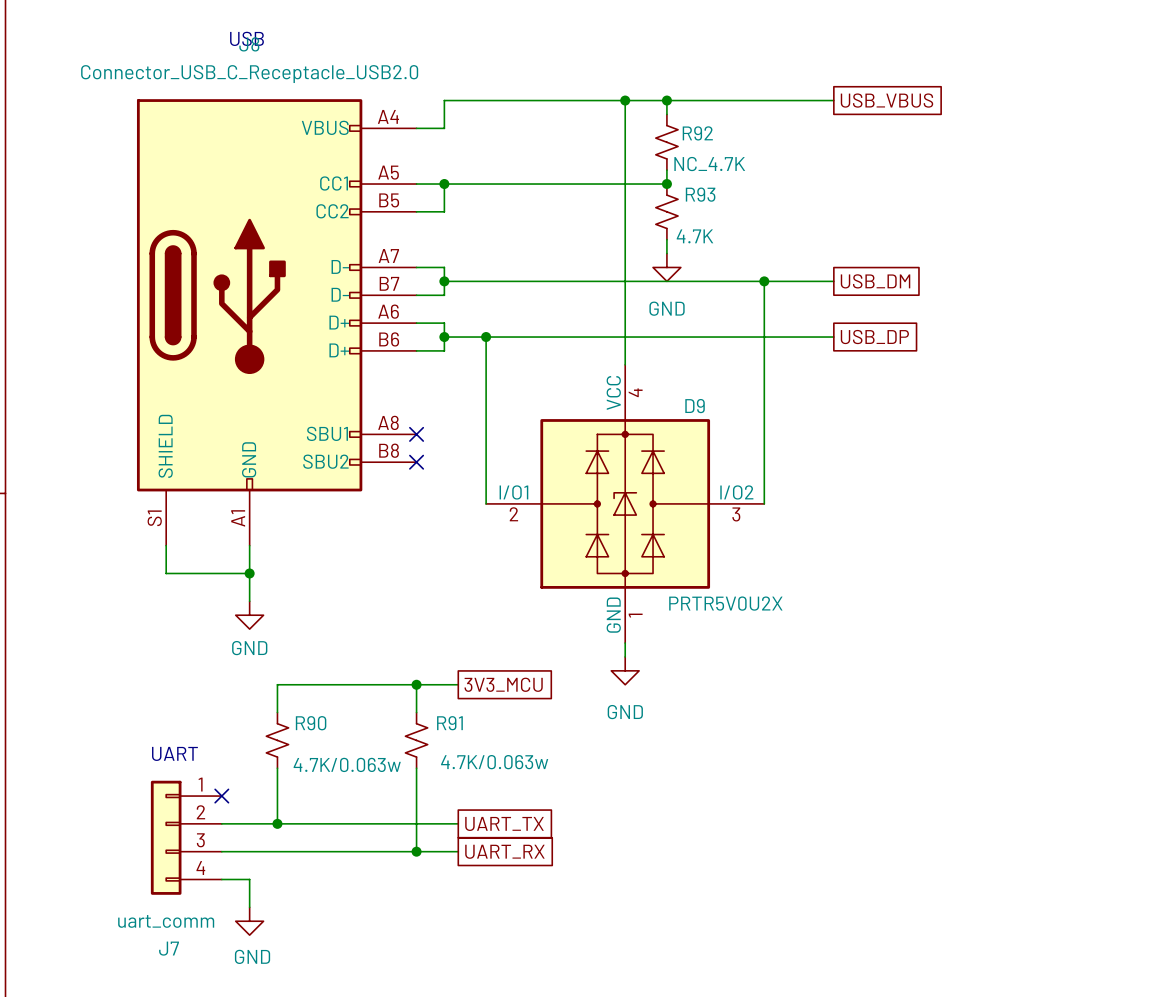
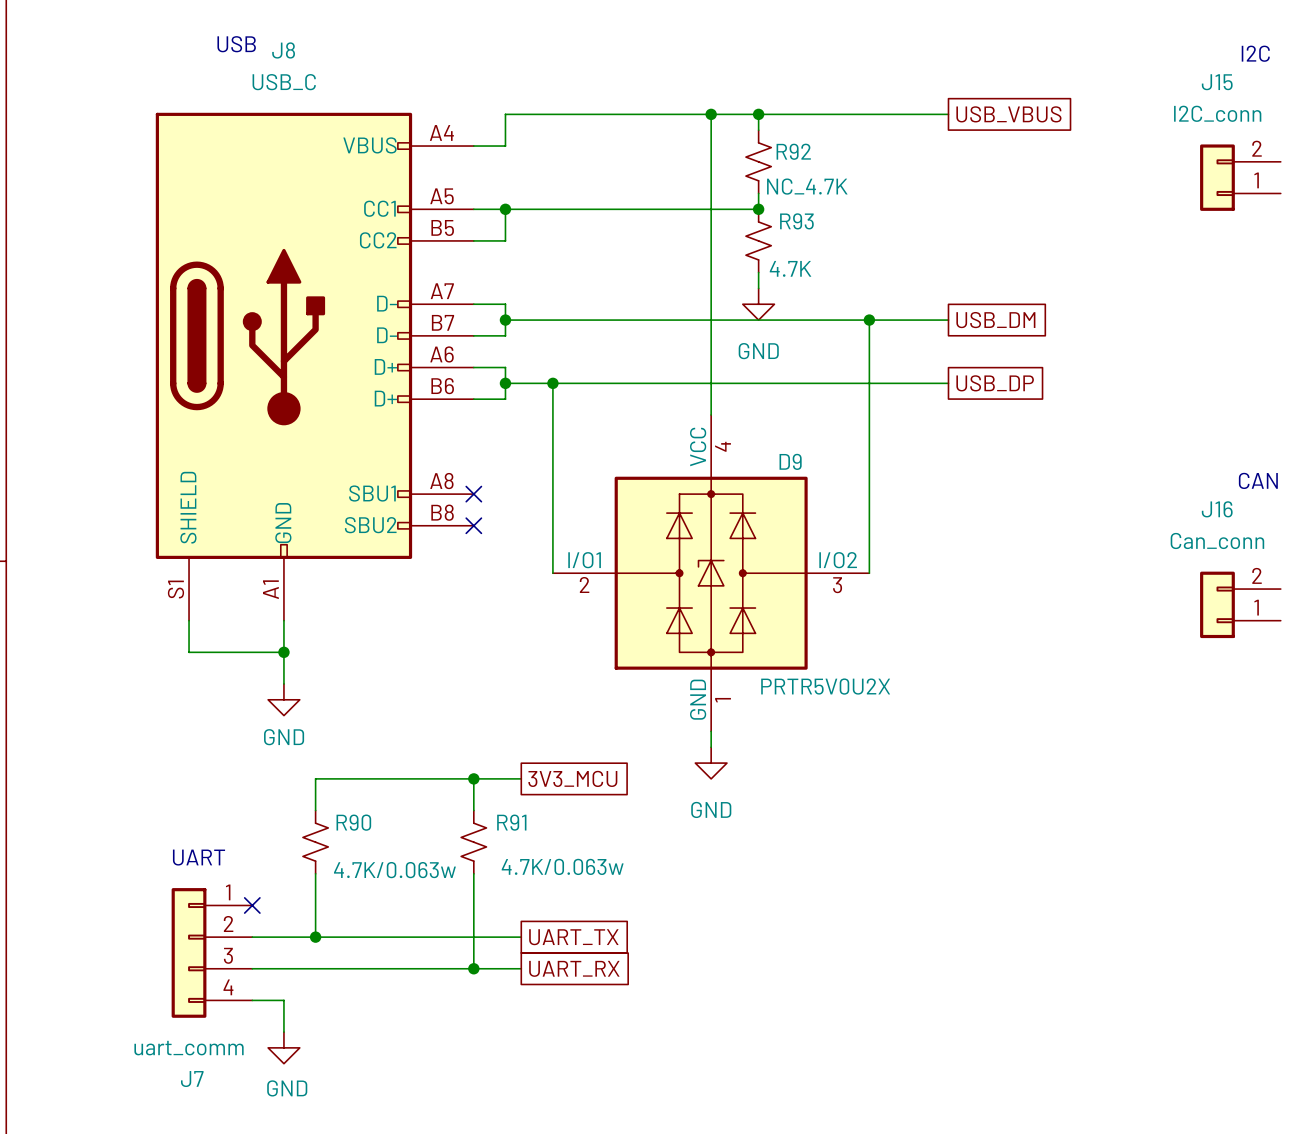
text position: USB (246, 38) -> USB (236, 44)
text: none -> I2C (1255, 53)
J8 value: Connector_USB_C_Receptacle_USB2.0 (249, 74) -> USB_C (284, 82)
J15: none -> I2C_conn (1240, 177)
text: none -> CAN (1258, 480)
J16: none -> Can_conn (1240, 604)

